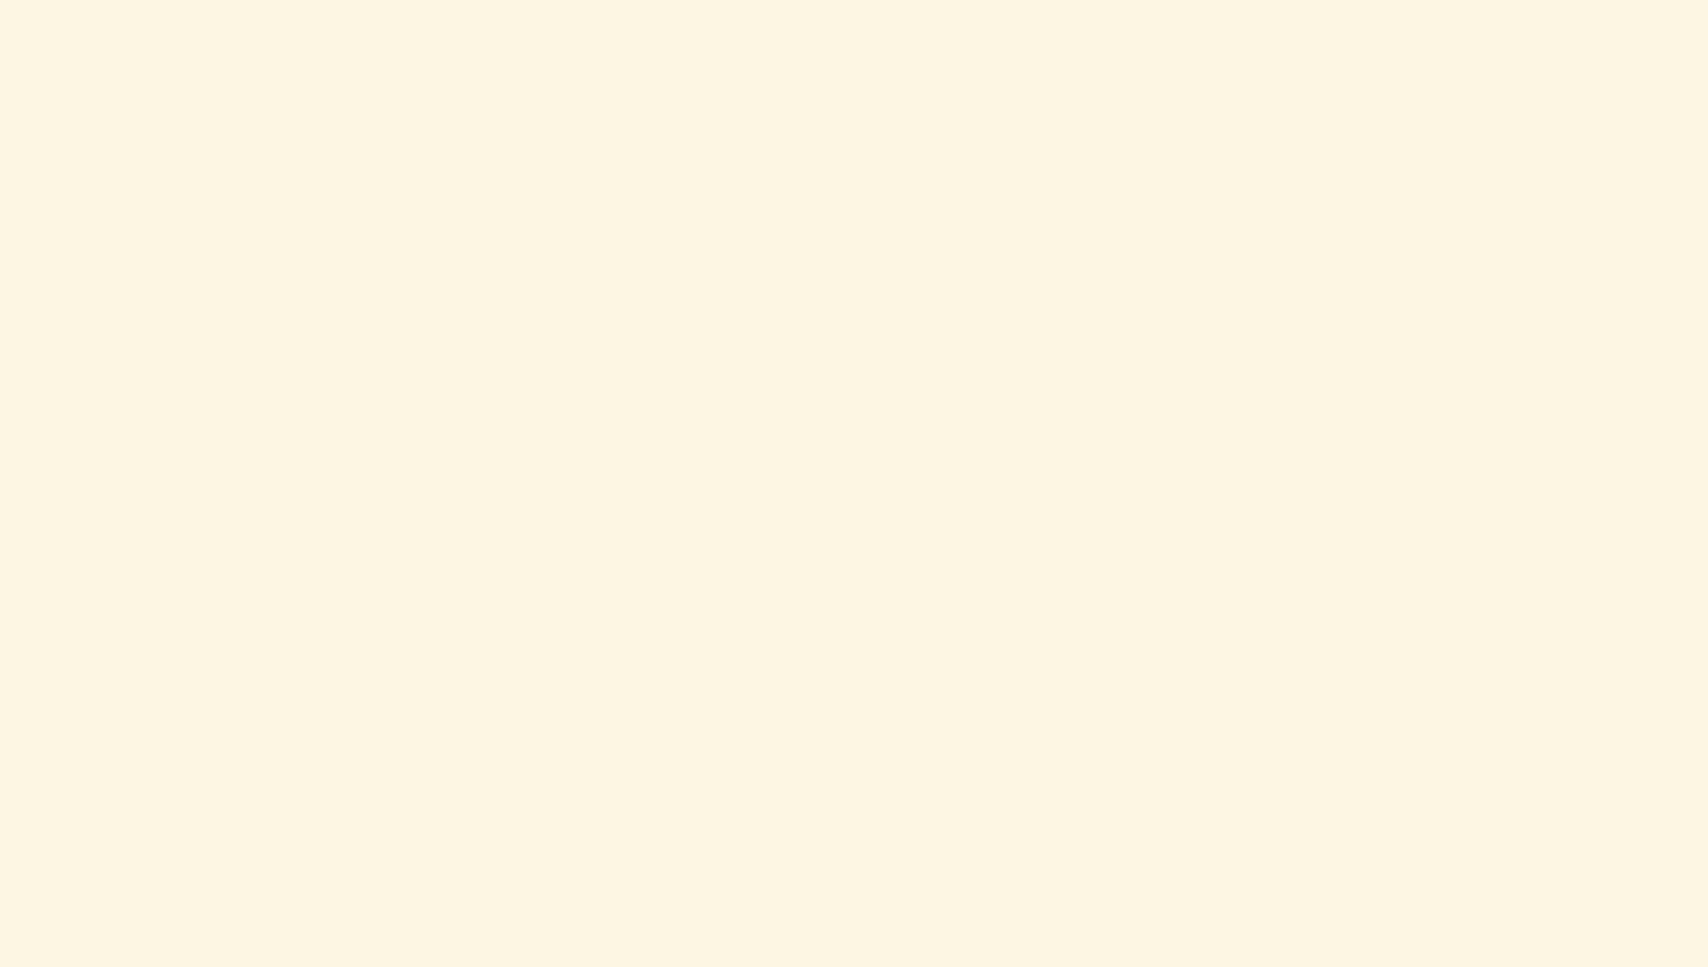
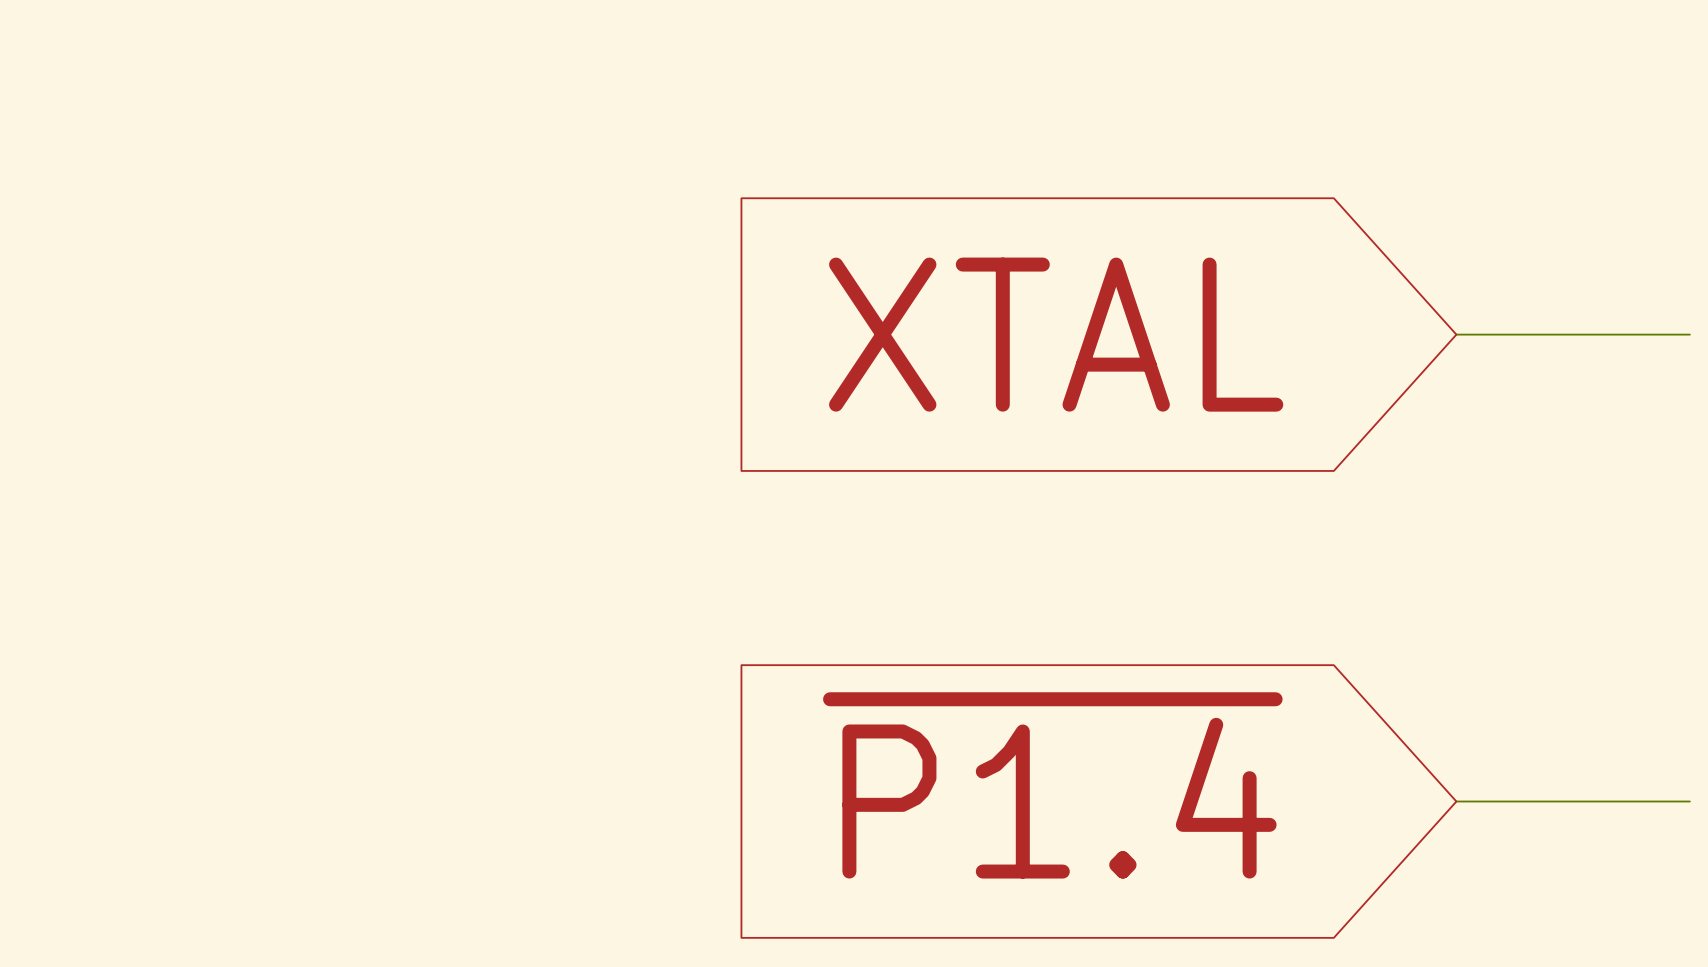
global label: none -> XTAL (1056, 334)
wire: none -> (1456, 334) (1689, 334)
global label: none -> ~{P1.4} (1052, 785)
wire: none -> (1456, 801) (1689, 801)

